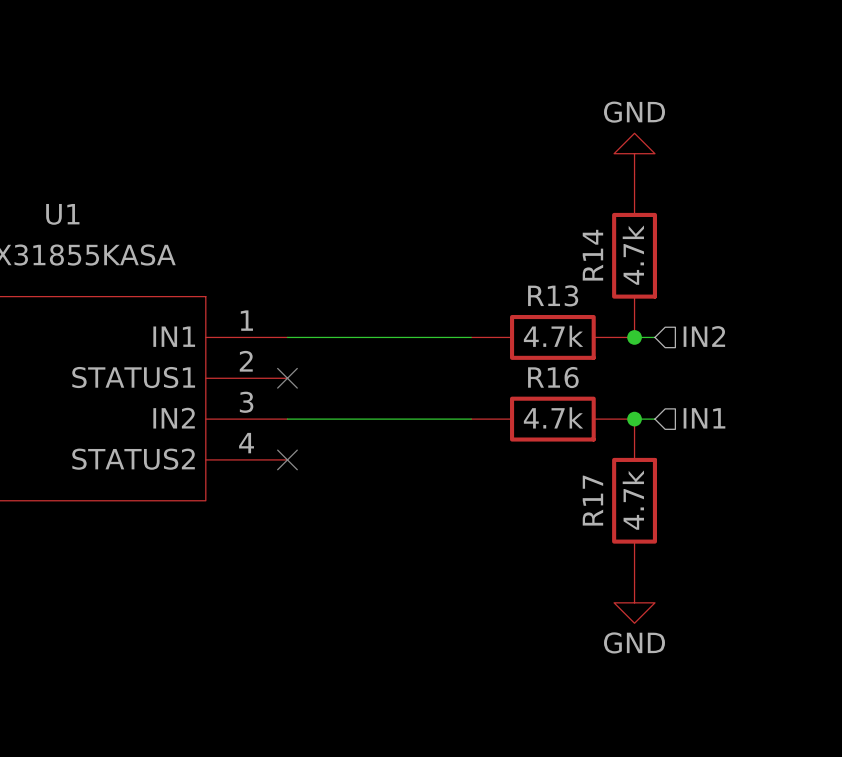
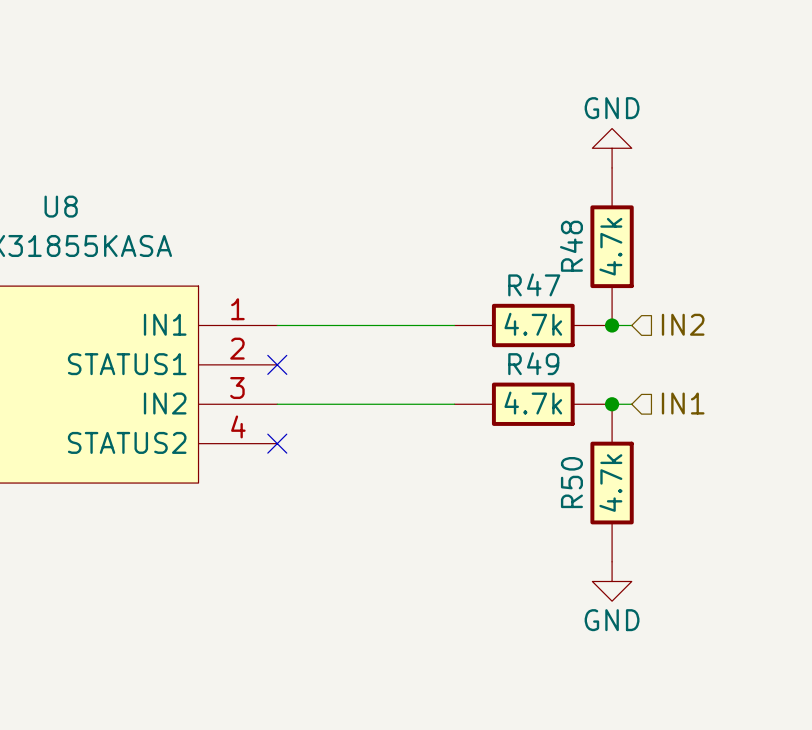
U1 name: U1 (62, 214) -> U8 (61, 206)
R14 name: R14 (592, 255) -> R48 (571, 246)
R13 name: R13 (553, 295) -> R47 (534, 284)
R16 name: R16 (553, 377) -> R49 (533, 363)
R17 name: R17 (592, 500) -> R50 (571, 482)

